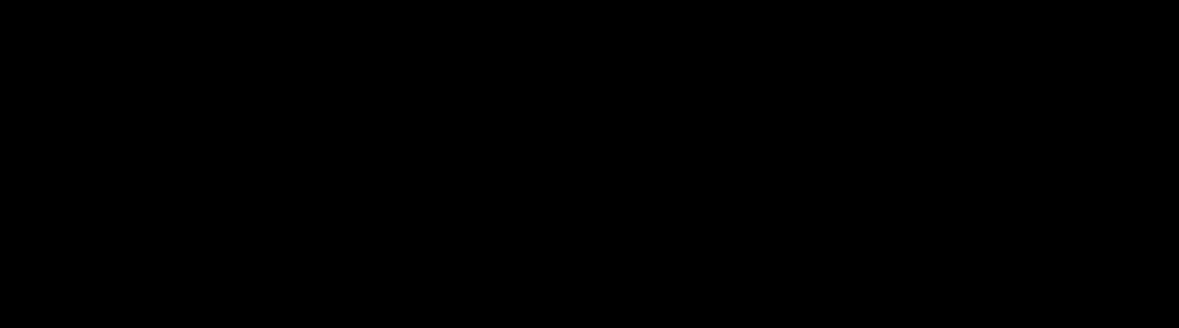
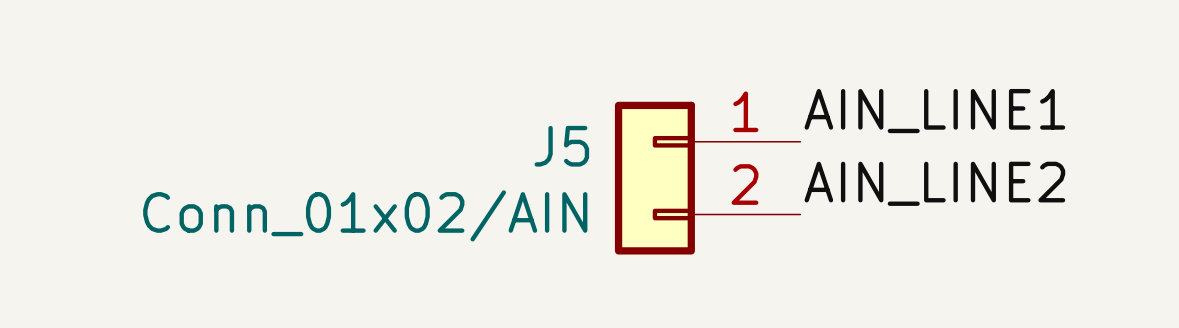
label: none -> AIN_LINE1 (934, 111)
J5: none -> Conn_01x02/AIN (707, 178)
label: none -> AIN_LINE2 (934, 183)

